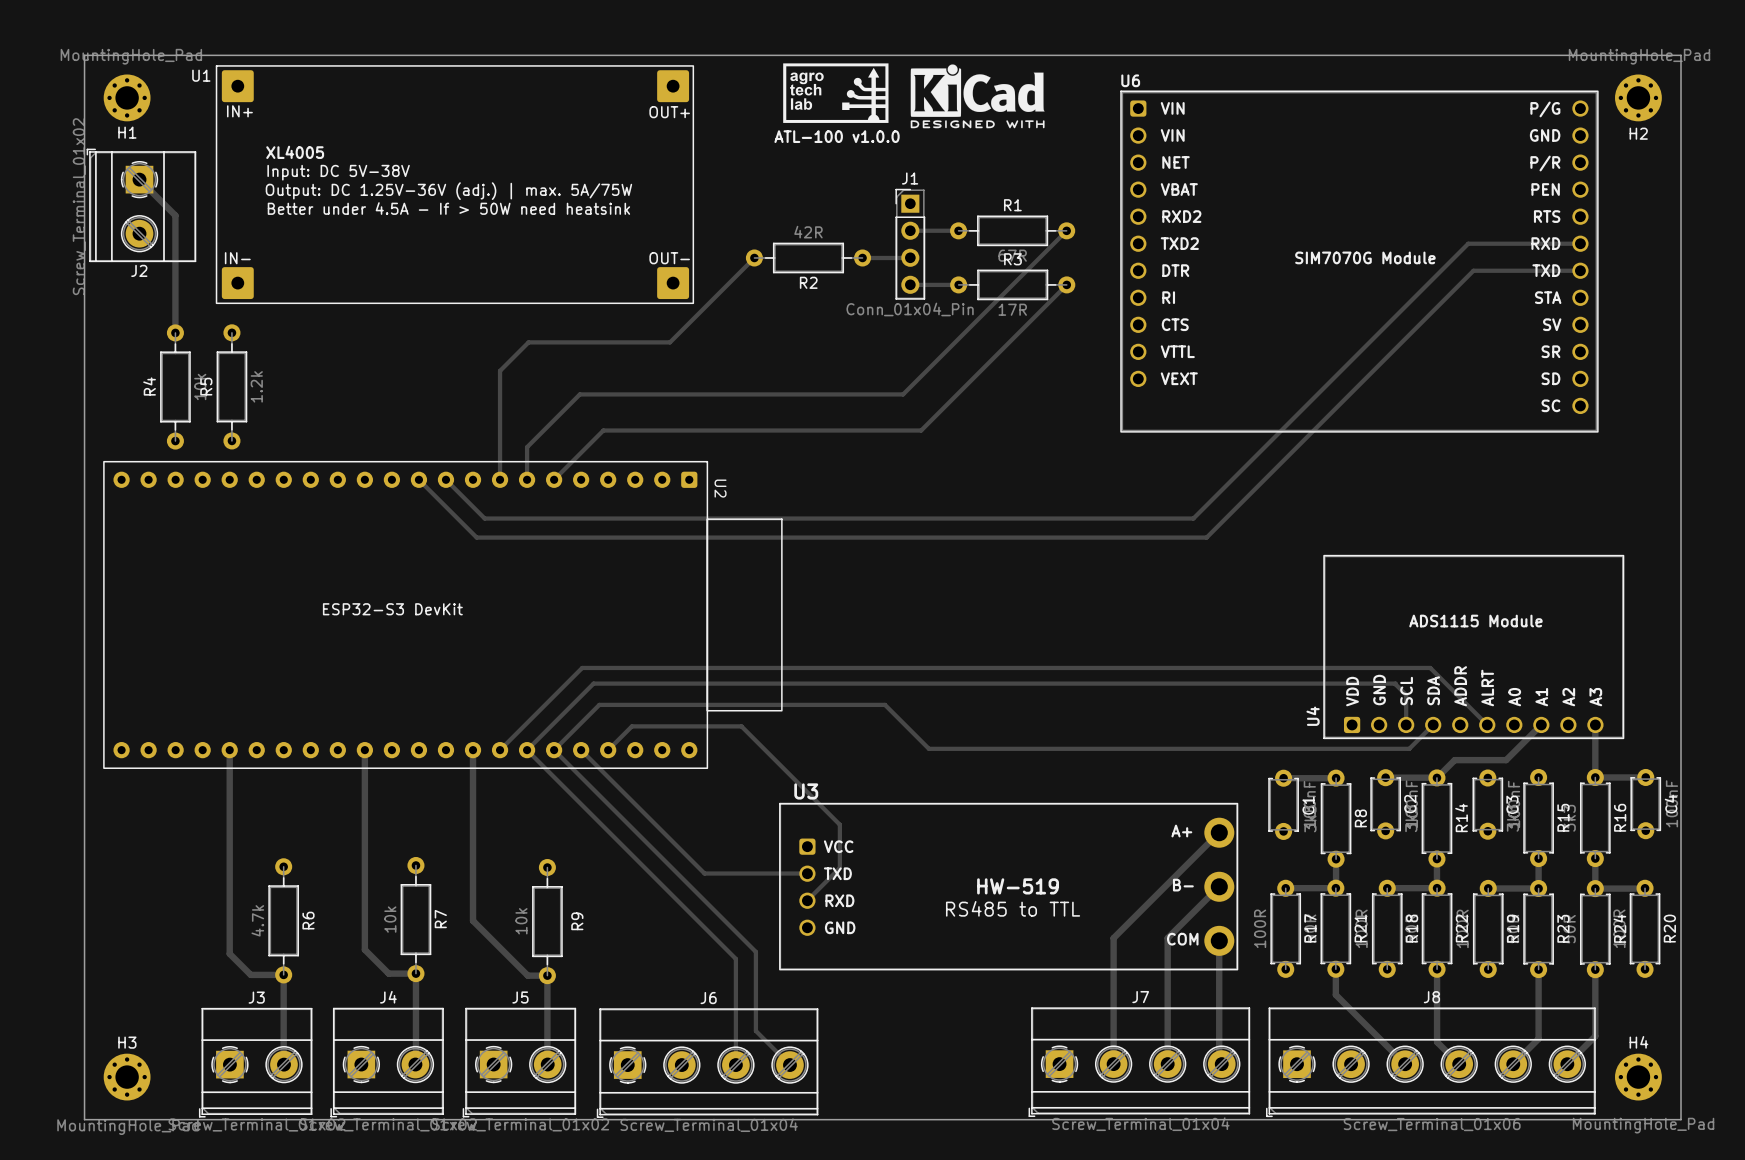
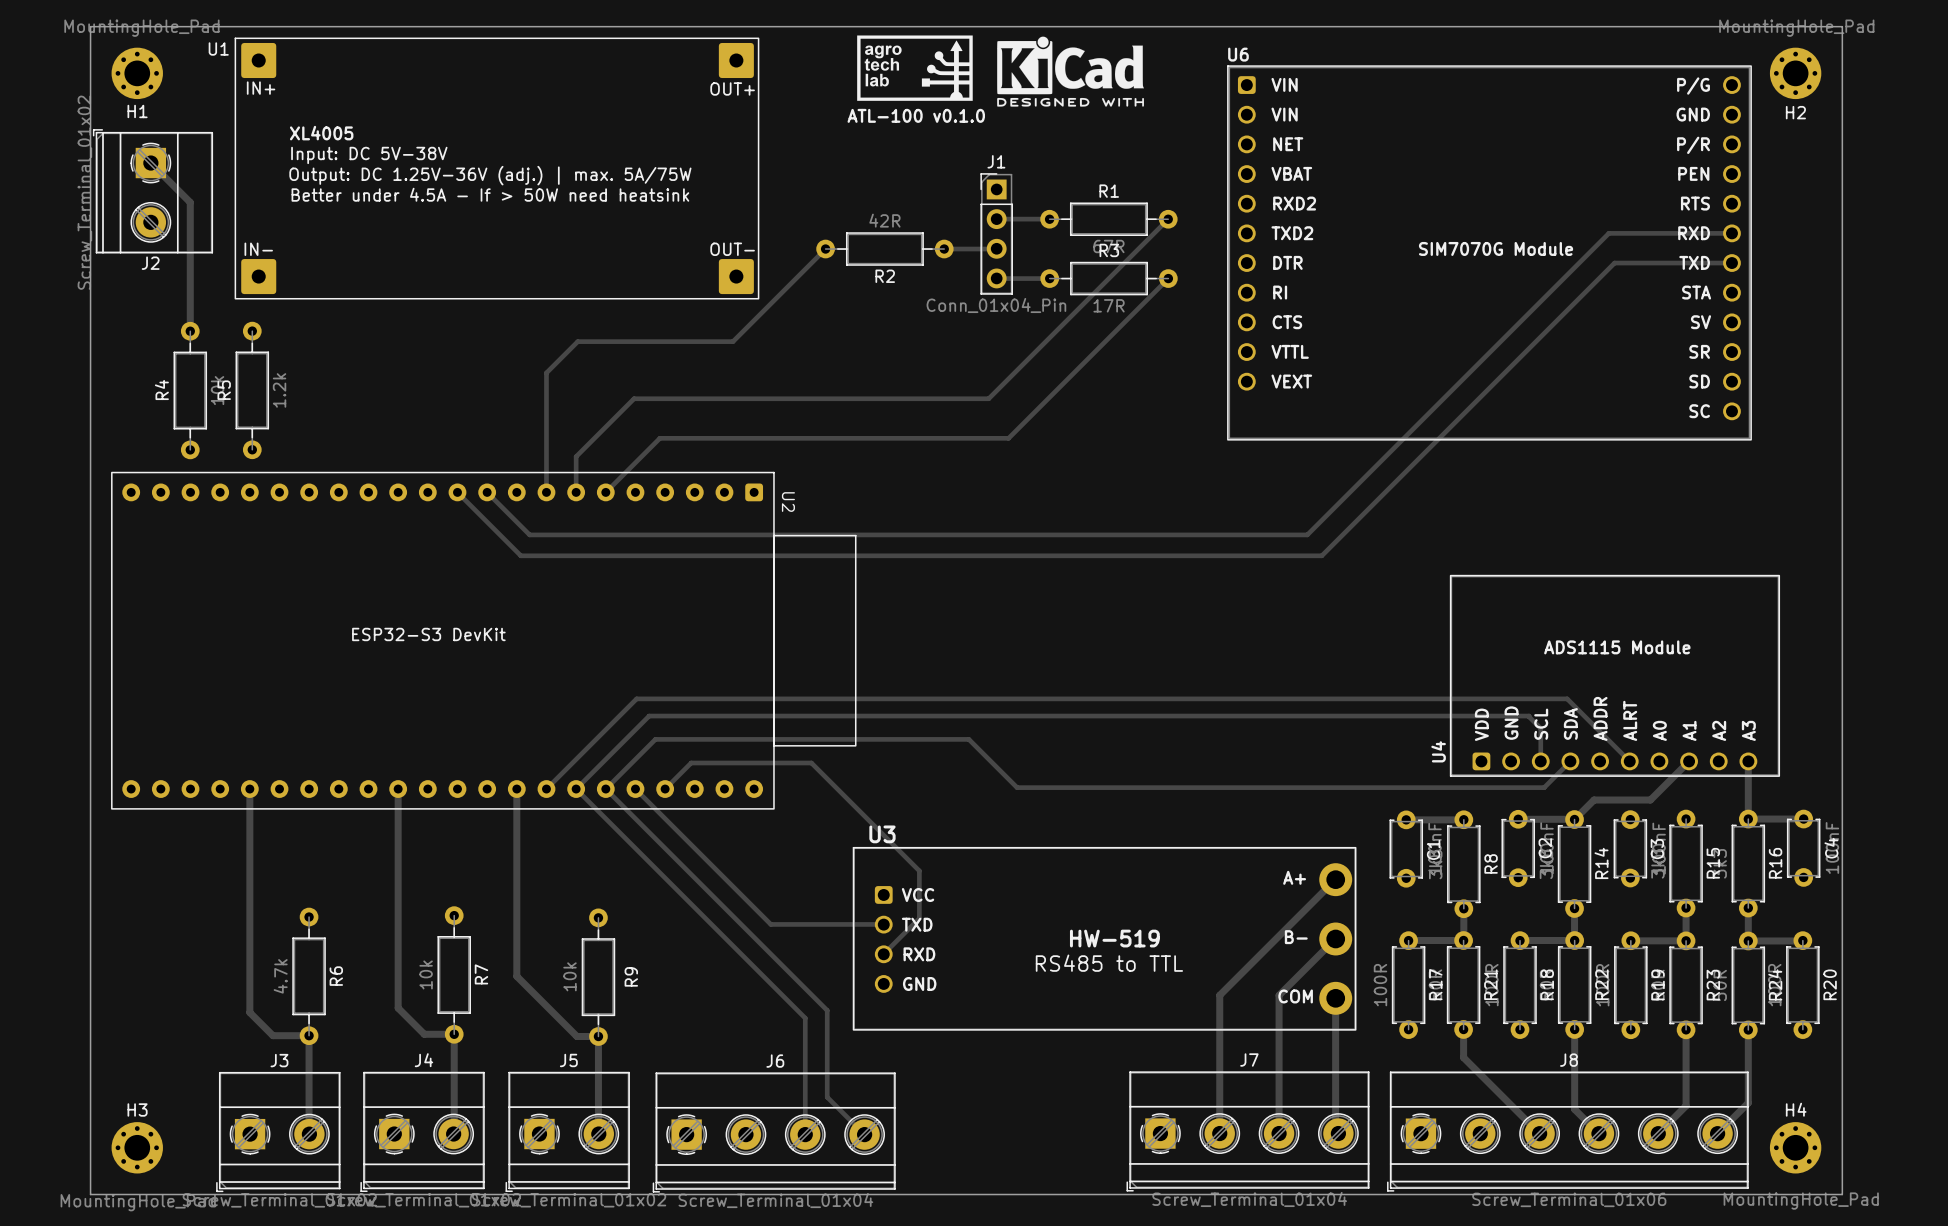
text: ATL-100 v1.0.0 (837, 136) -> ATL-100 v0.1.0 (916, 115)

